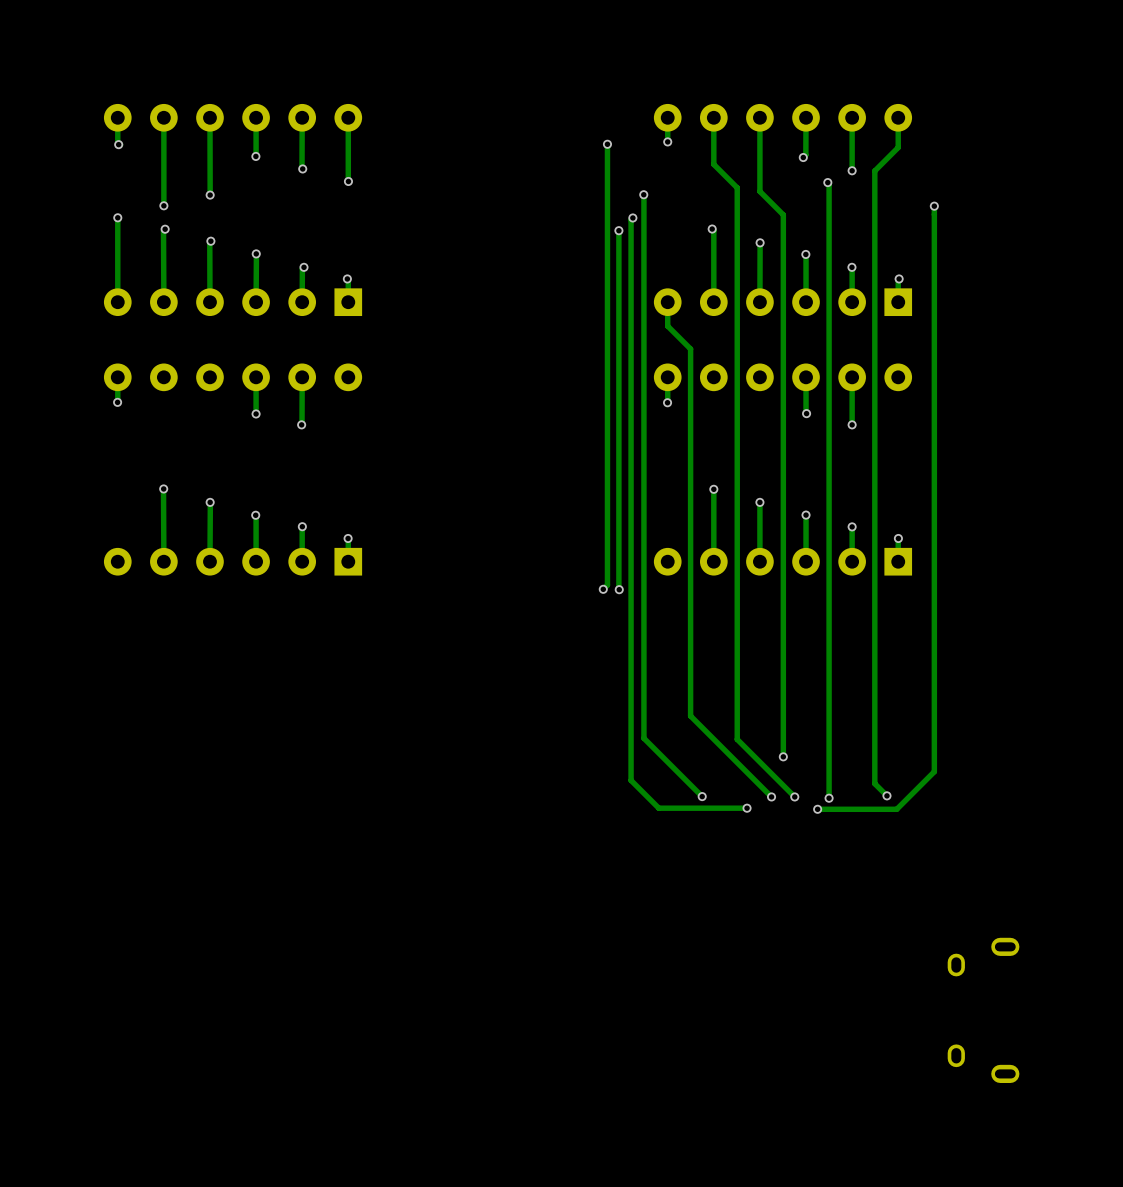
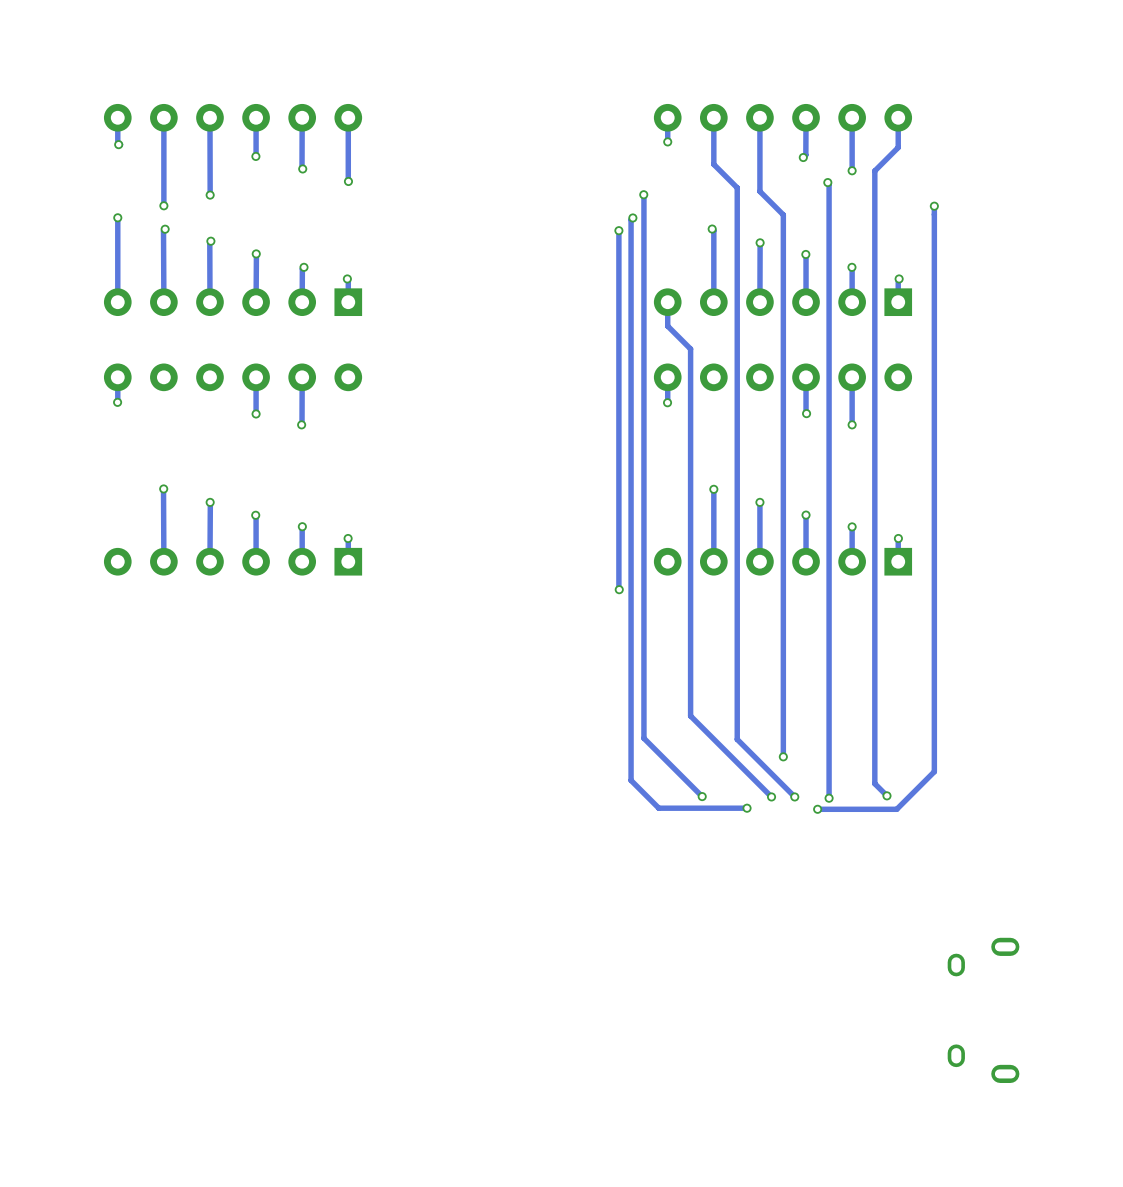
track: (607, 144) (607, 585) (603, 589) -> none
via: (607, 144) -> none
via: (603, 589) -> none

